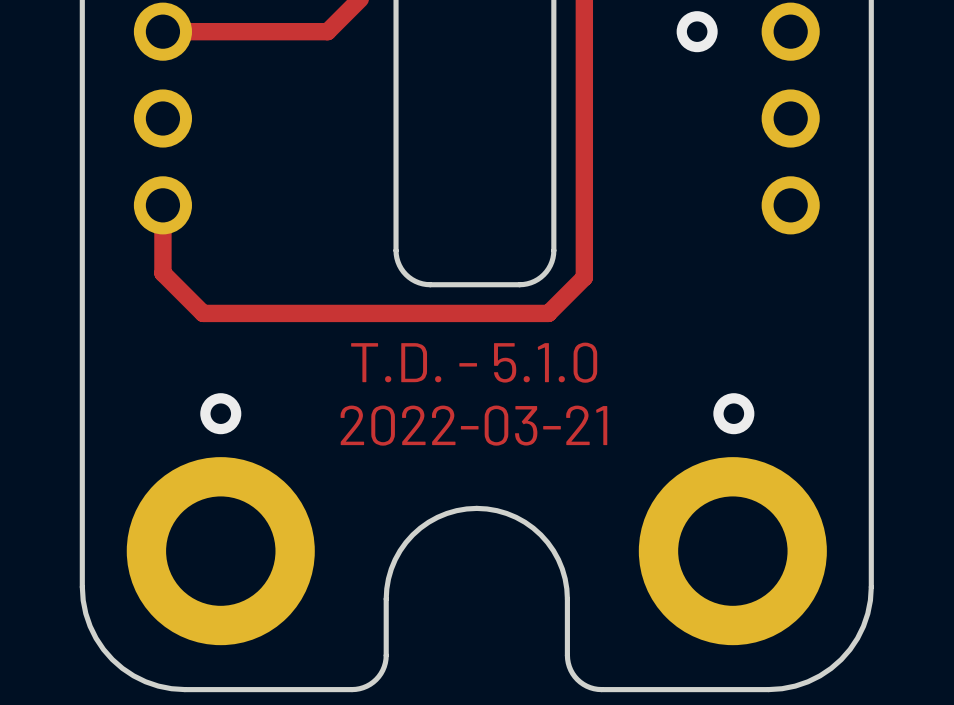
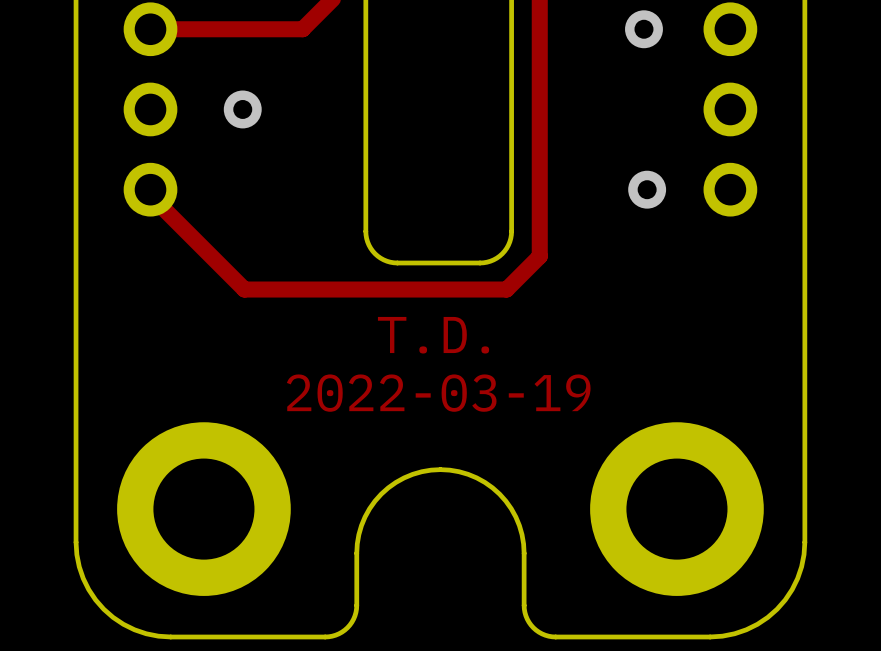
via: none -> (242, 109)
via: none -> (647, 189)
track: (162, 211) (162, 273) (203, 313) (264, 313) -> (150, 195) (244, 289)
text: T.D. - 5.1.0 (474, 362) -> T.D. (433, 335)
via: (220, 413) -> none
via: (733, 413) -> none
text: 2022-03-21 (473, 425) -> 2022-03-19 (438, 393)

